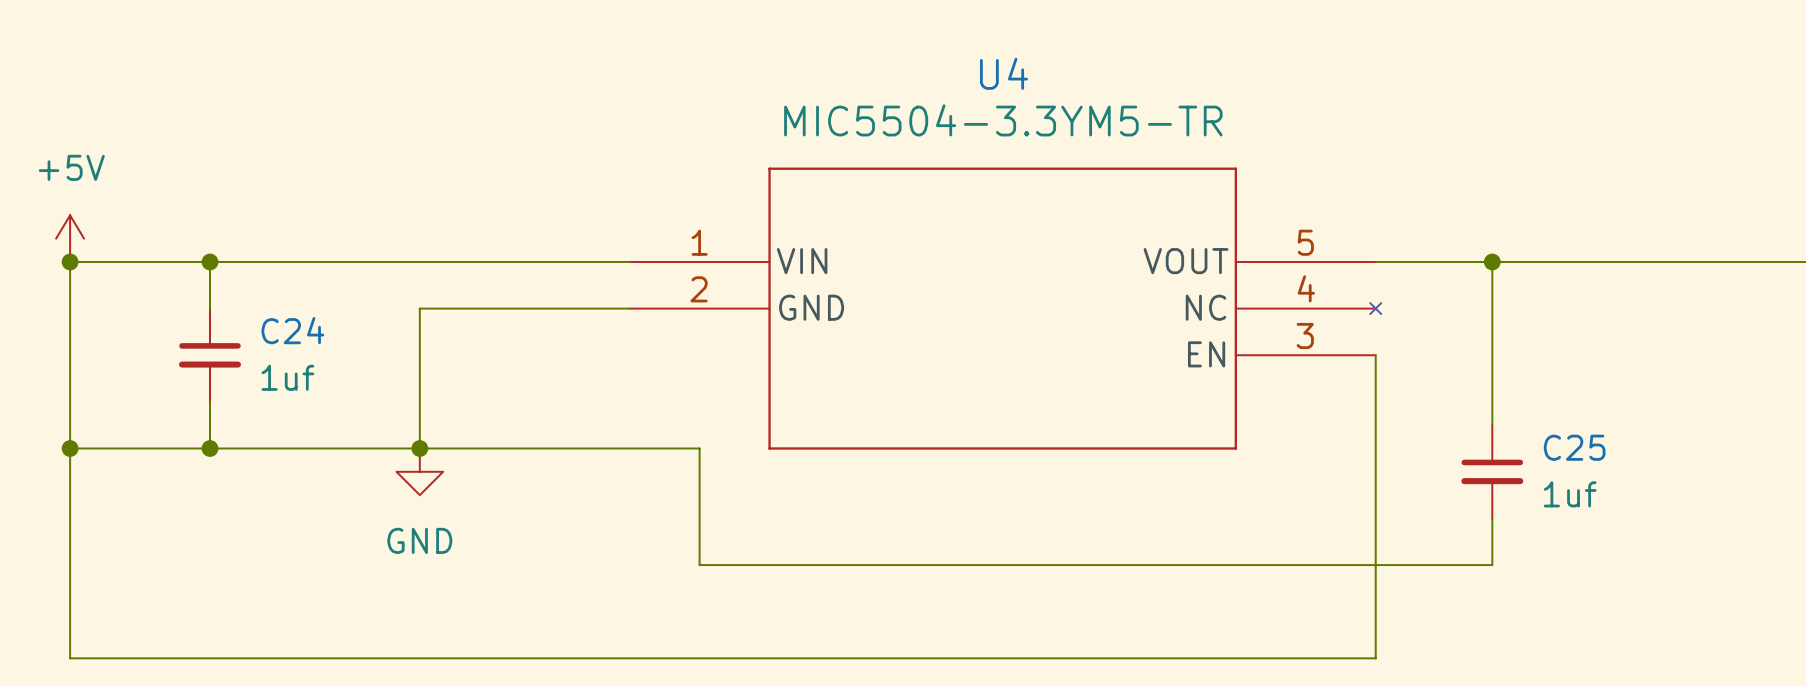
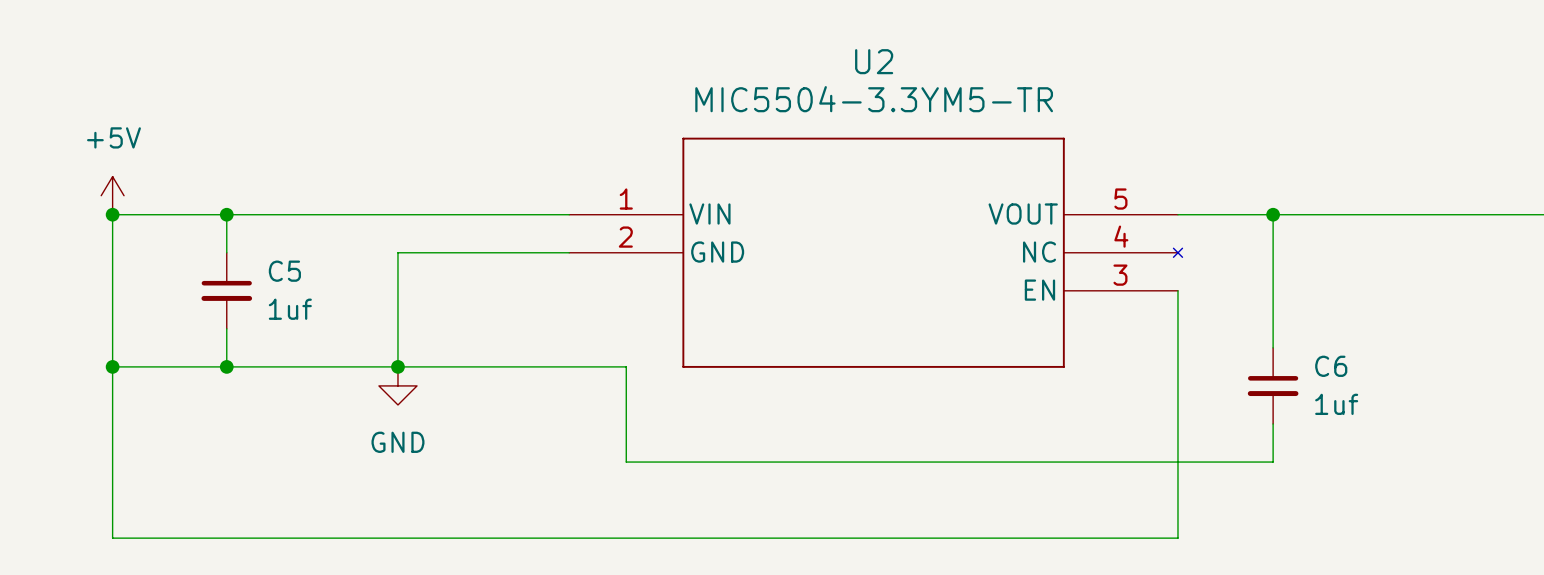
U4 name: U4 (1004, 73) -> U2 (874, 61)
C24 name: C24 (292, 330) -> C5 (284, 271)
C25 name: C25 (1574, 447) -> C6 (1331, 366)

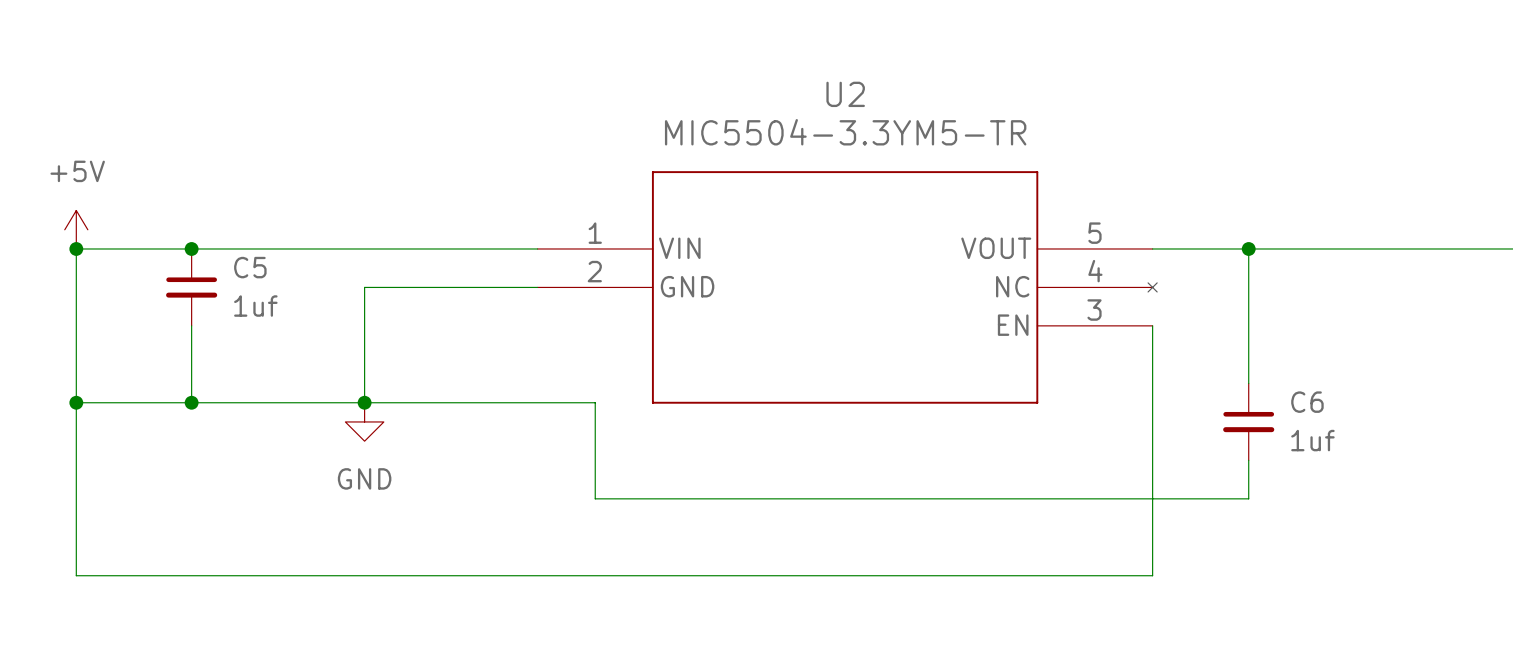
C5 position: (226, 290) -> (191, 287)

